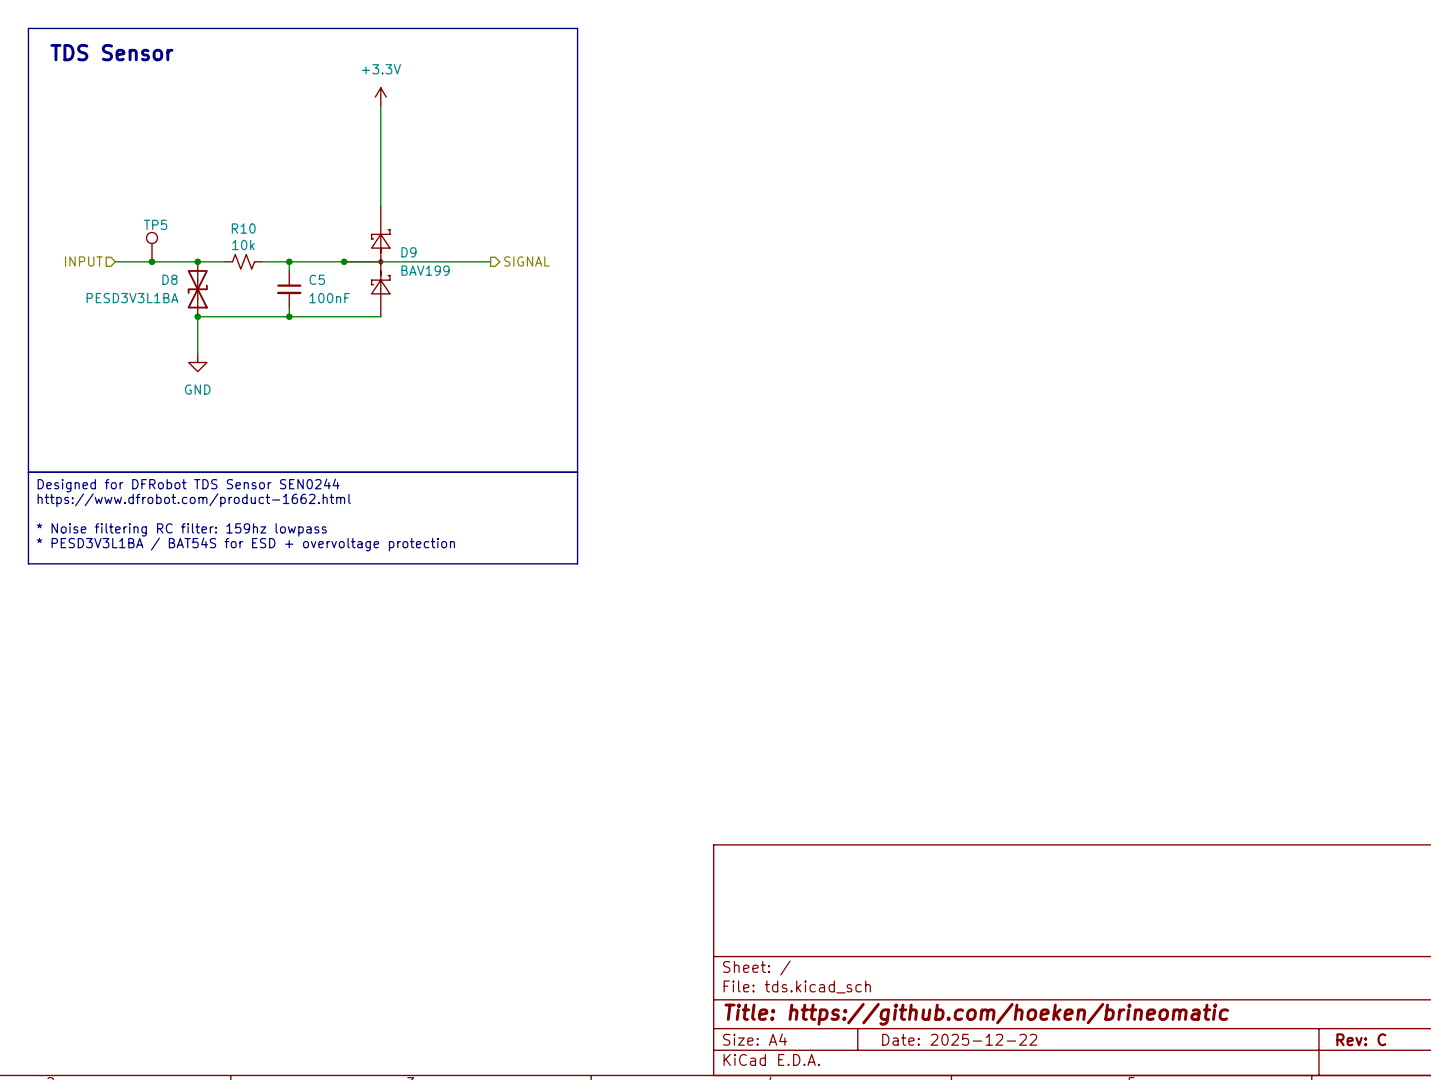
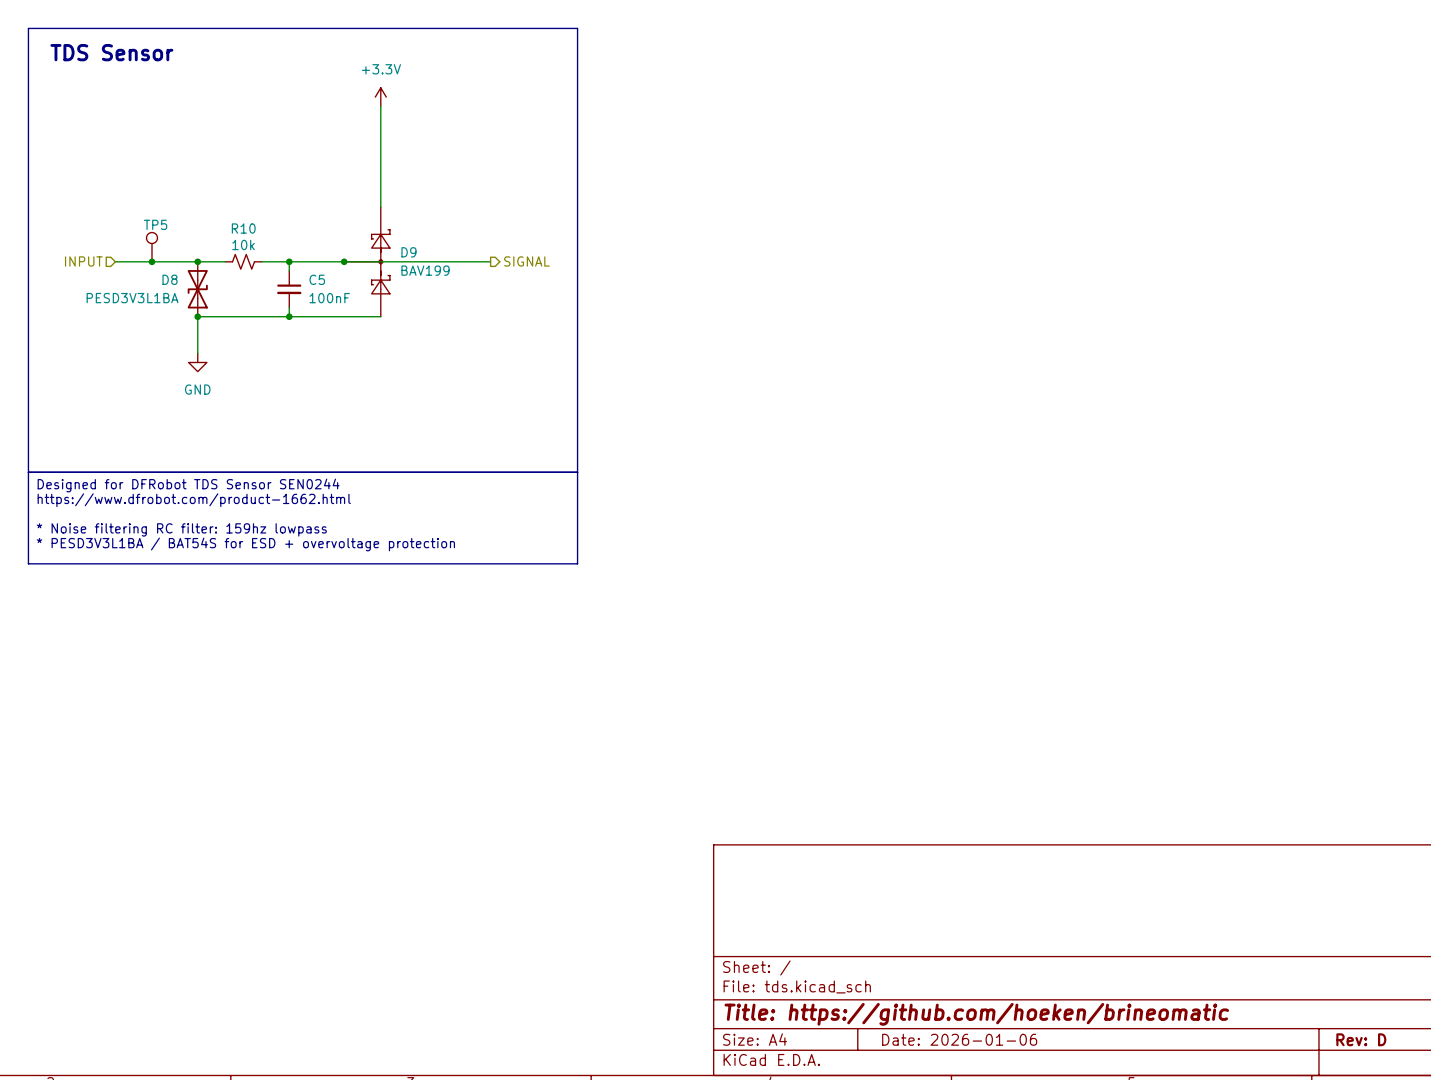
title block: Date: 2025-12-22 (959, 1039) -> Date: 2026-01-06 (959, 1039)
title block: Rev: C (1361, 1039) -> Rev: D (1361, 1039)

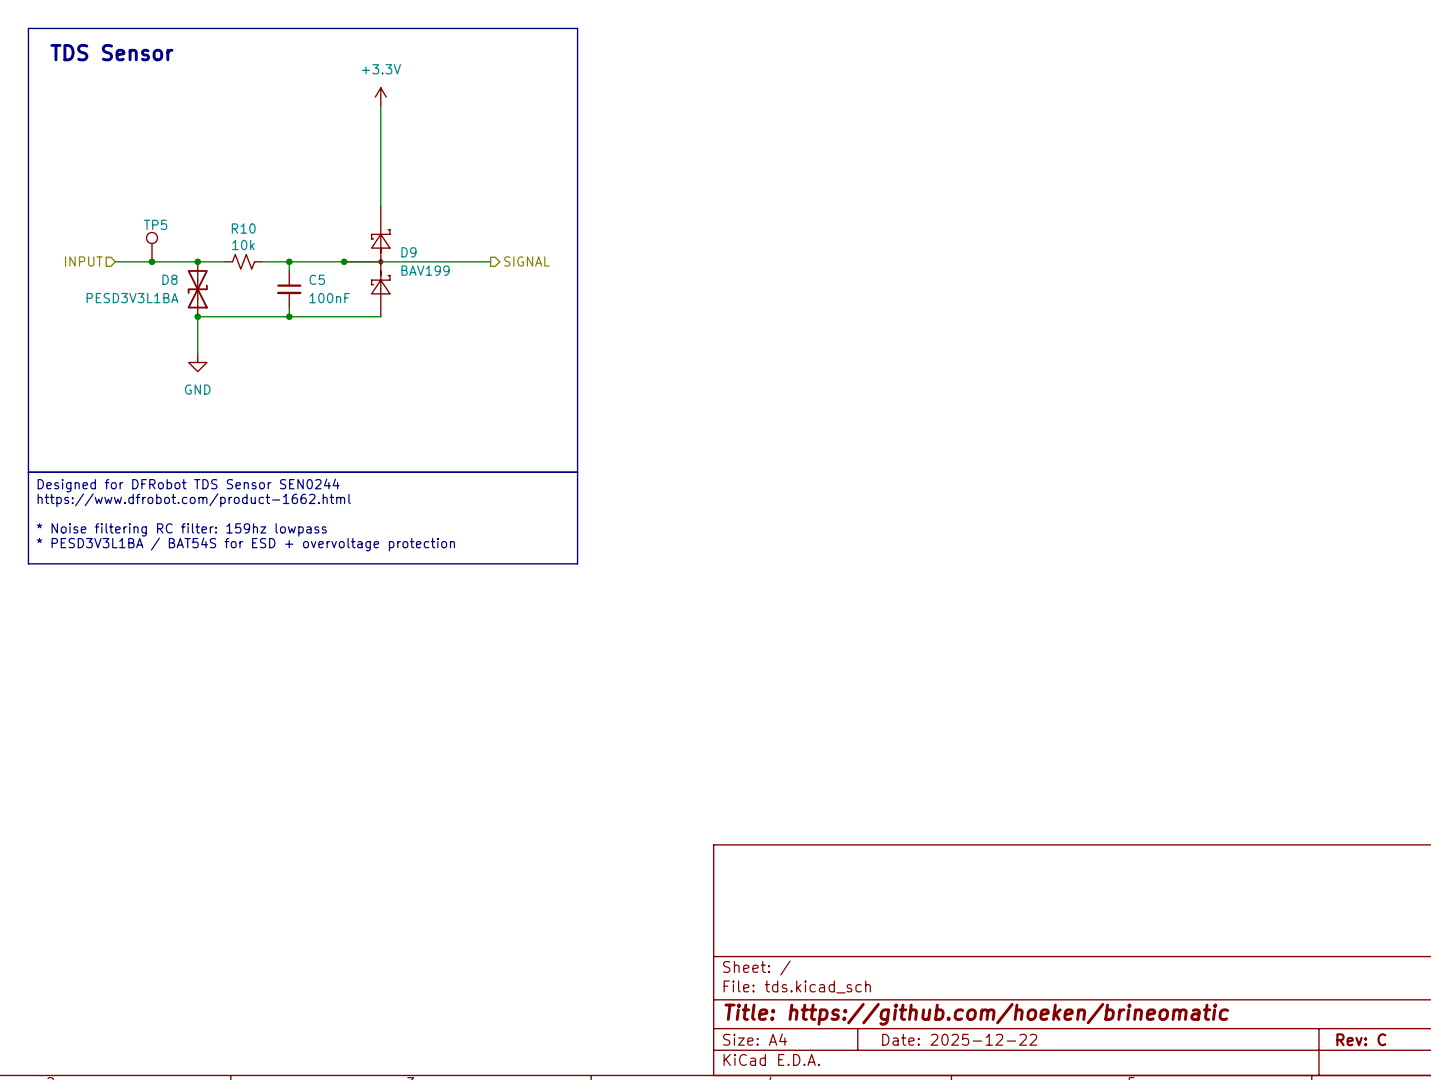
title block: Date: 2026-01-06 (959, 1039) -> Date: 2025-12-22 (959, 1039)
title block: Rev: D (1361, 1039) -> Rev: C (1361, 1039)

